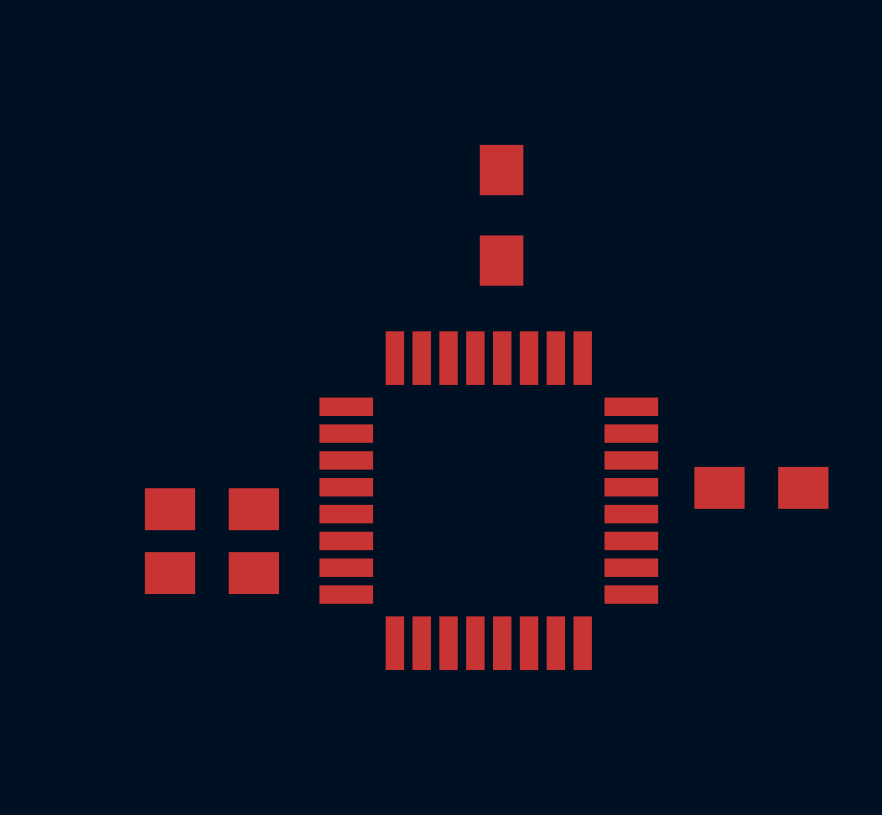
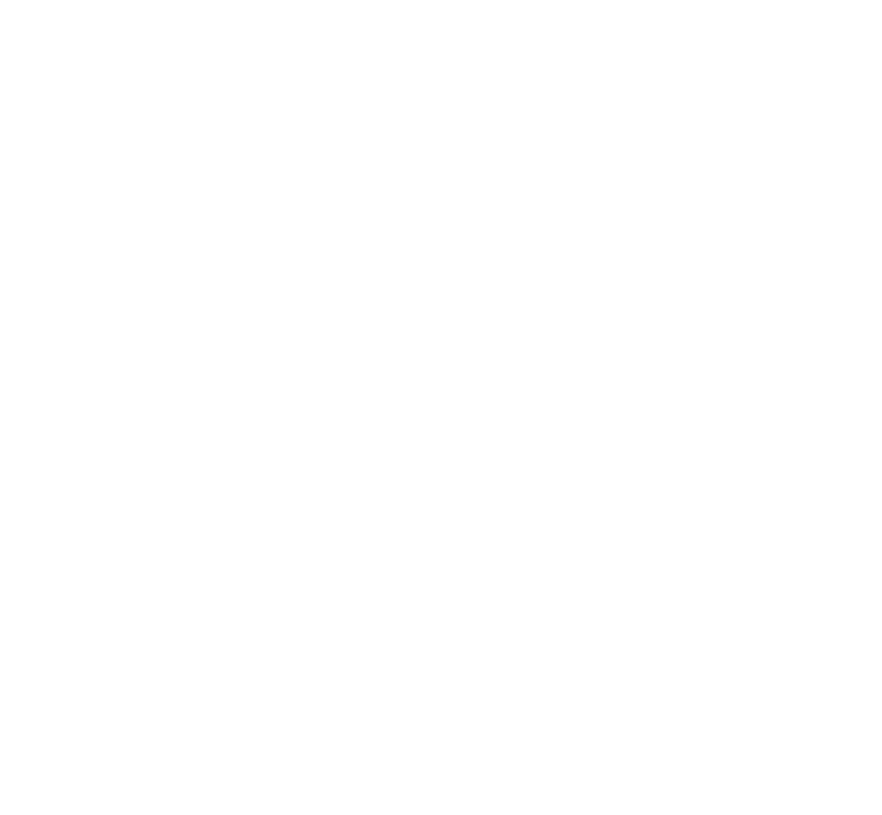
part: (501, 215) -> none
part: (761, 487) -> none
part: (488, 500) -> none
part: (211, 509) -> none
part: (211, 573) -> none

